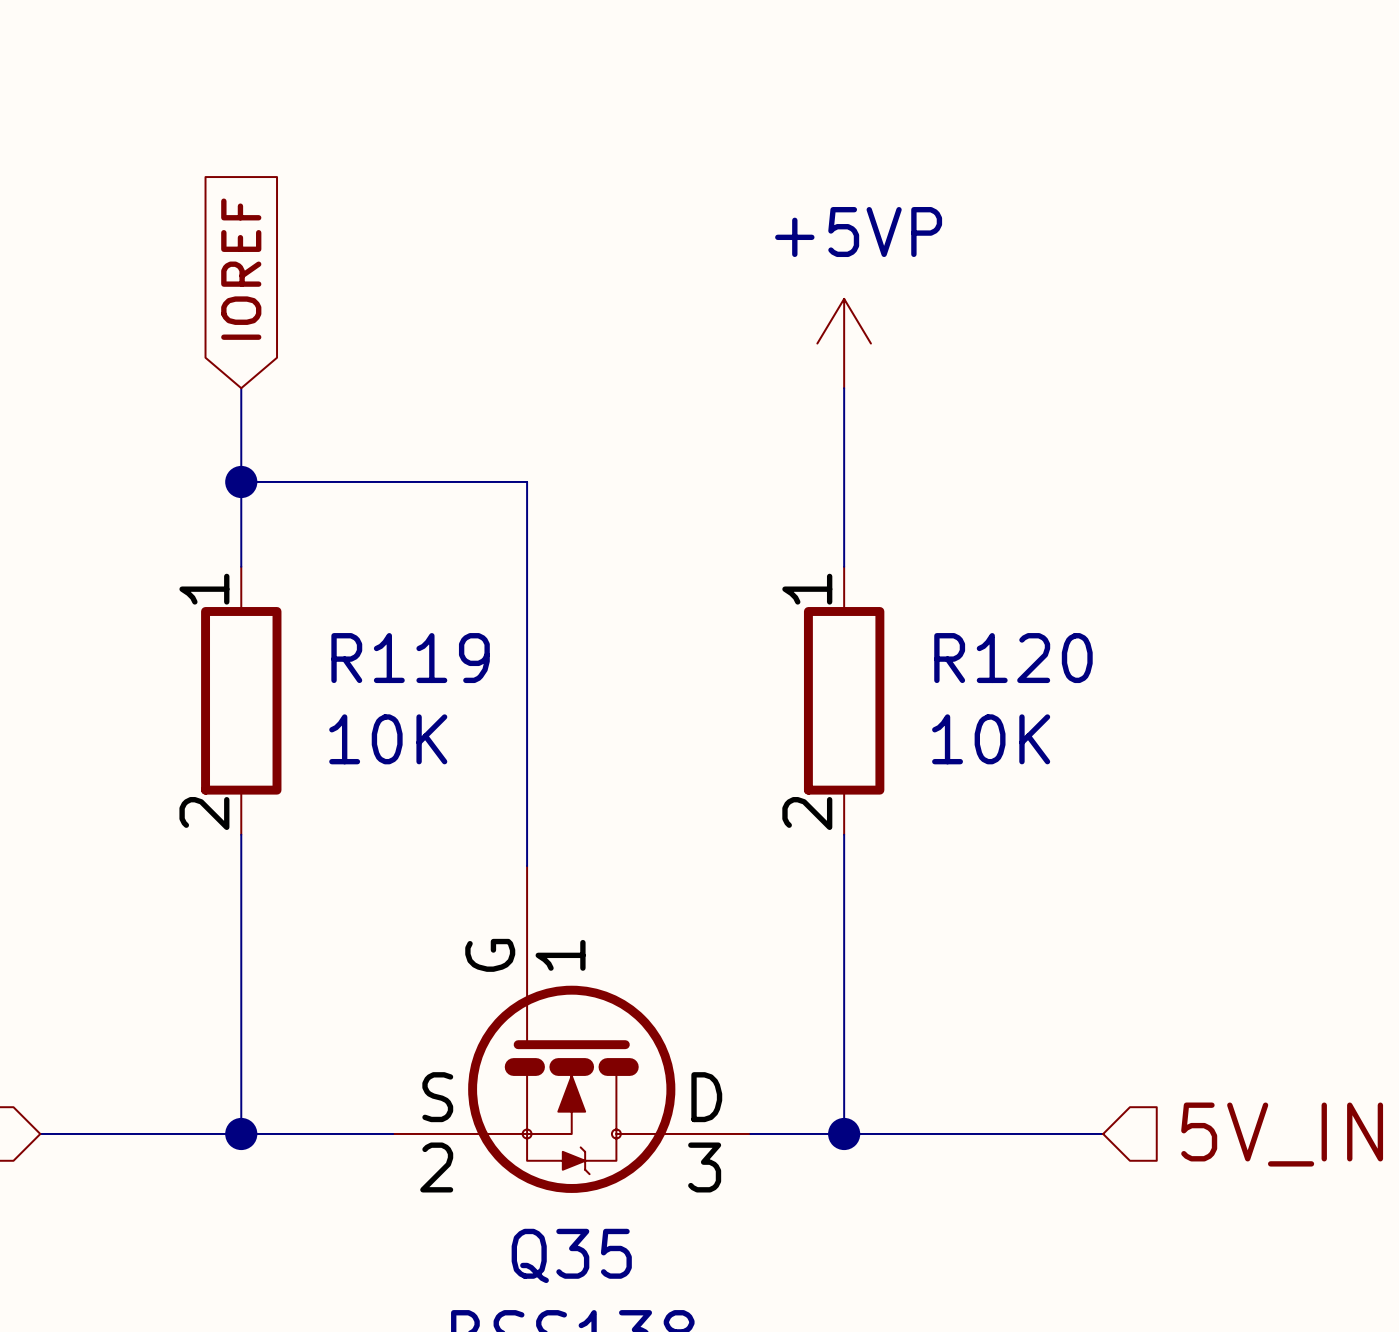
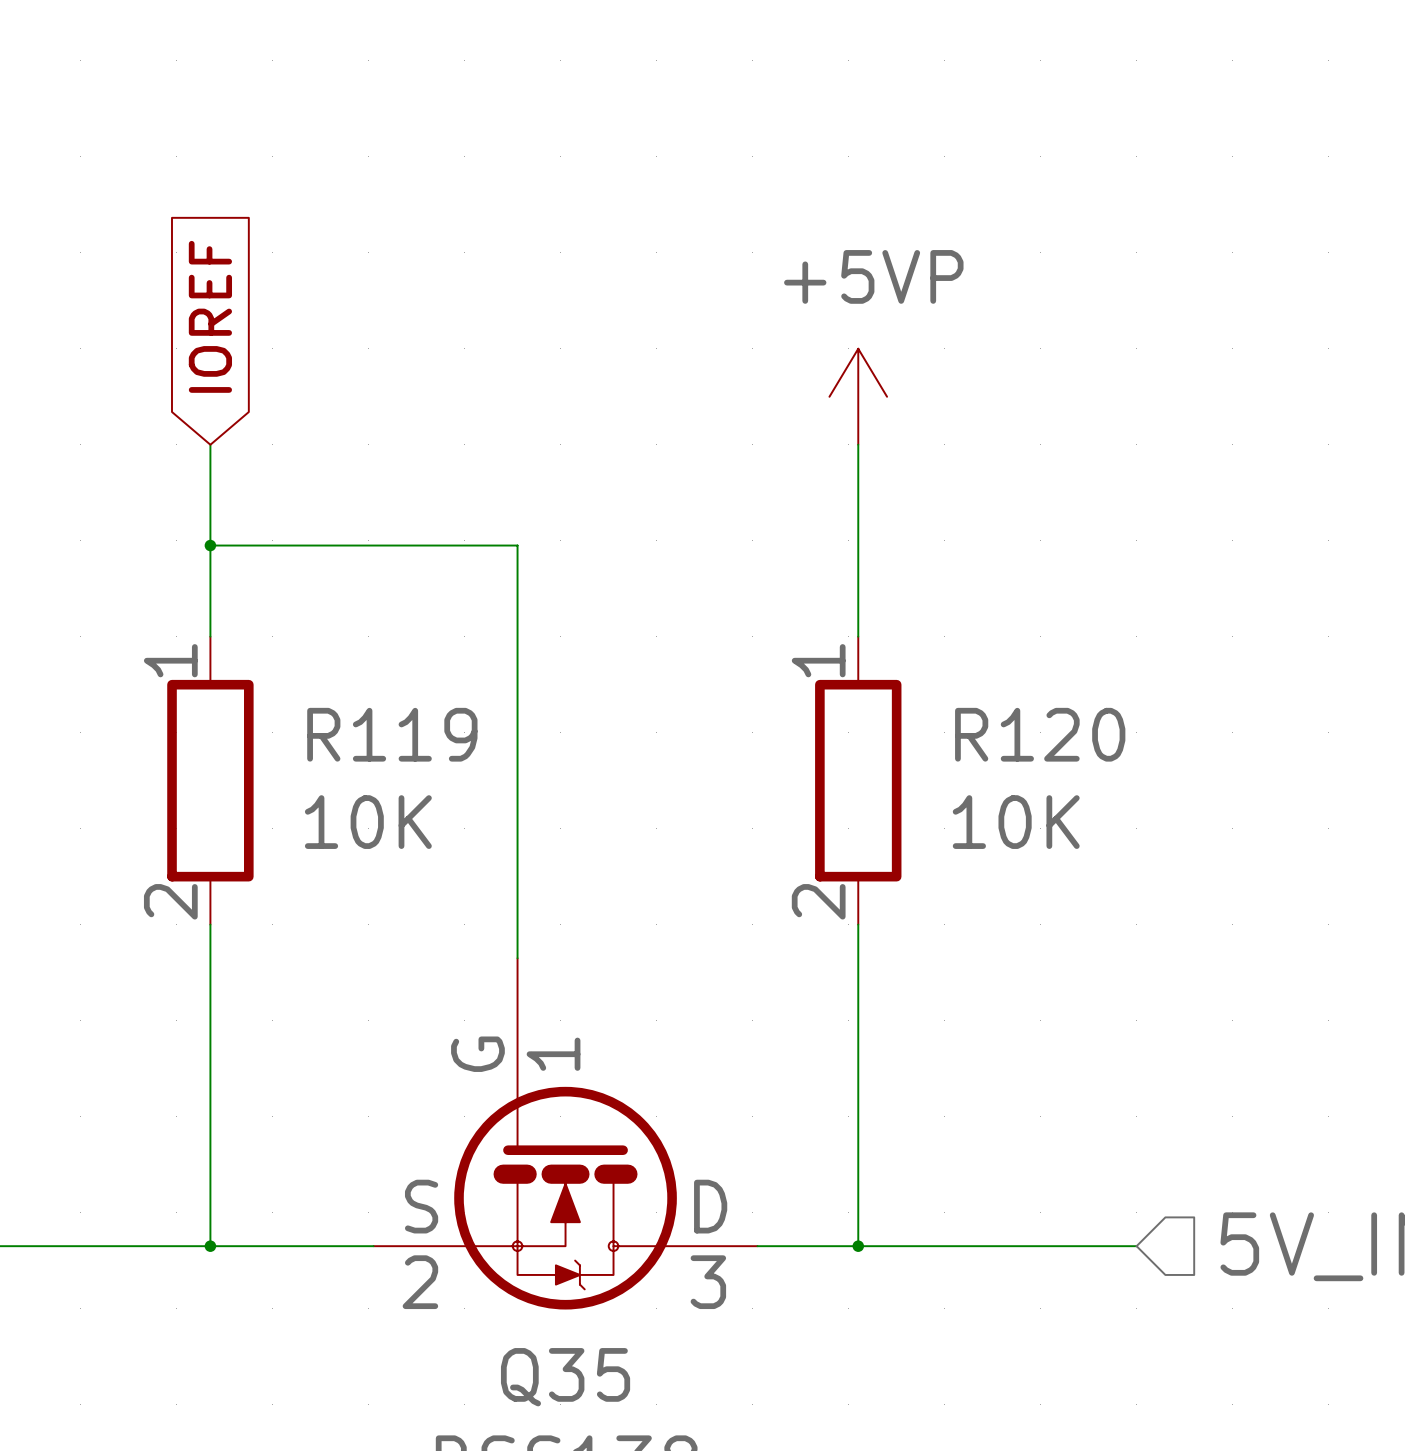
junction size: [225, 465, 258, 499] -> [204, 539, 217, 552]
junction size: [225, 1117, 258, 1151] -> [204, 1240, 217, 1252]
junction size: [828, 1117, 861, 1151] -> [852, 1240, 865, 1252]

